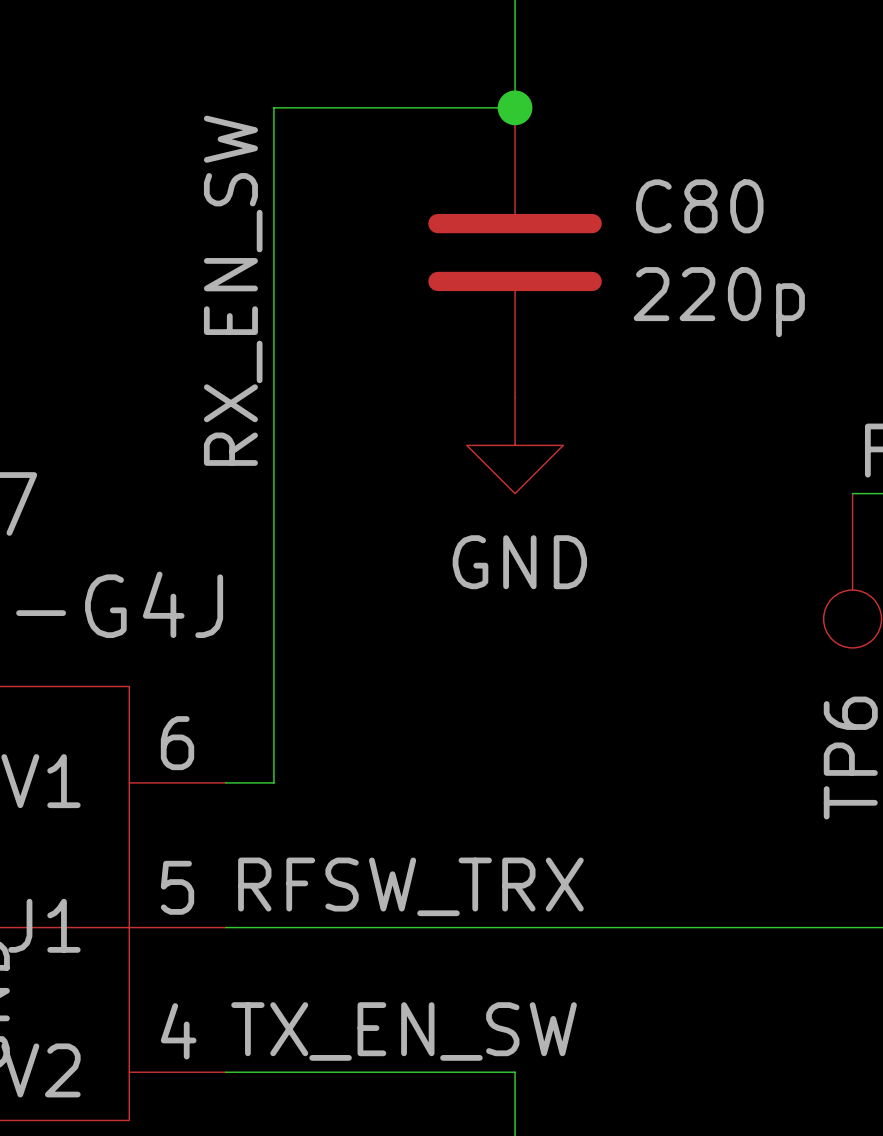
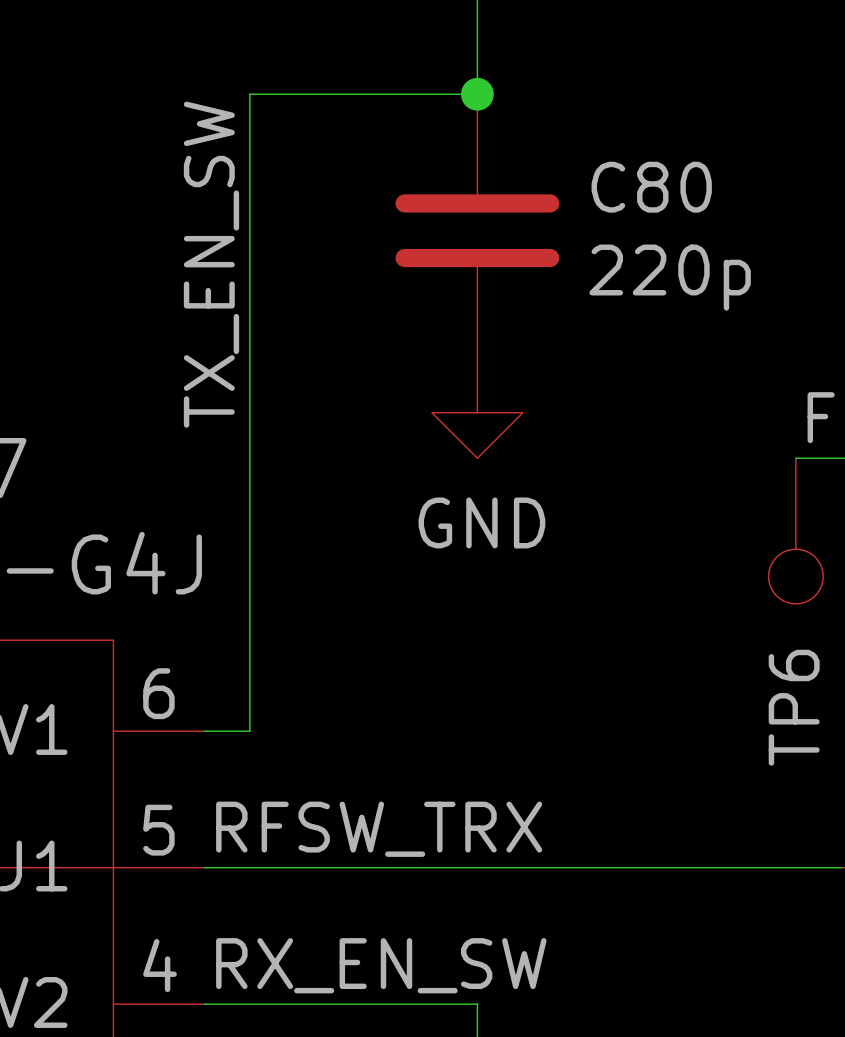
label: RX_EN_SW (233, 290) -> TX_EN_SW (211, 264)
label: TX_EN_SW (404, 1031) -> RX_EN_SW (381, 965)

